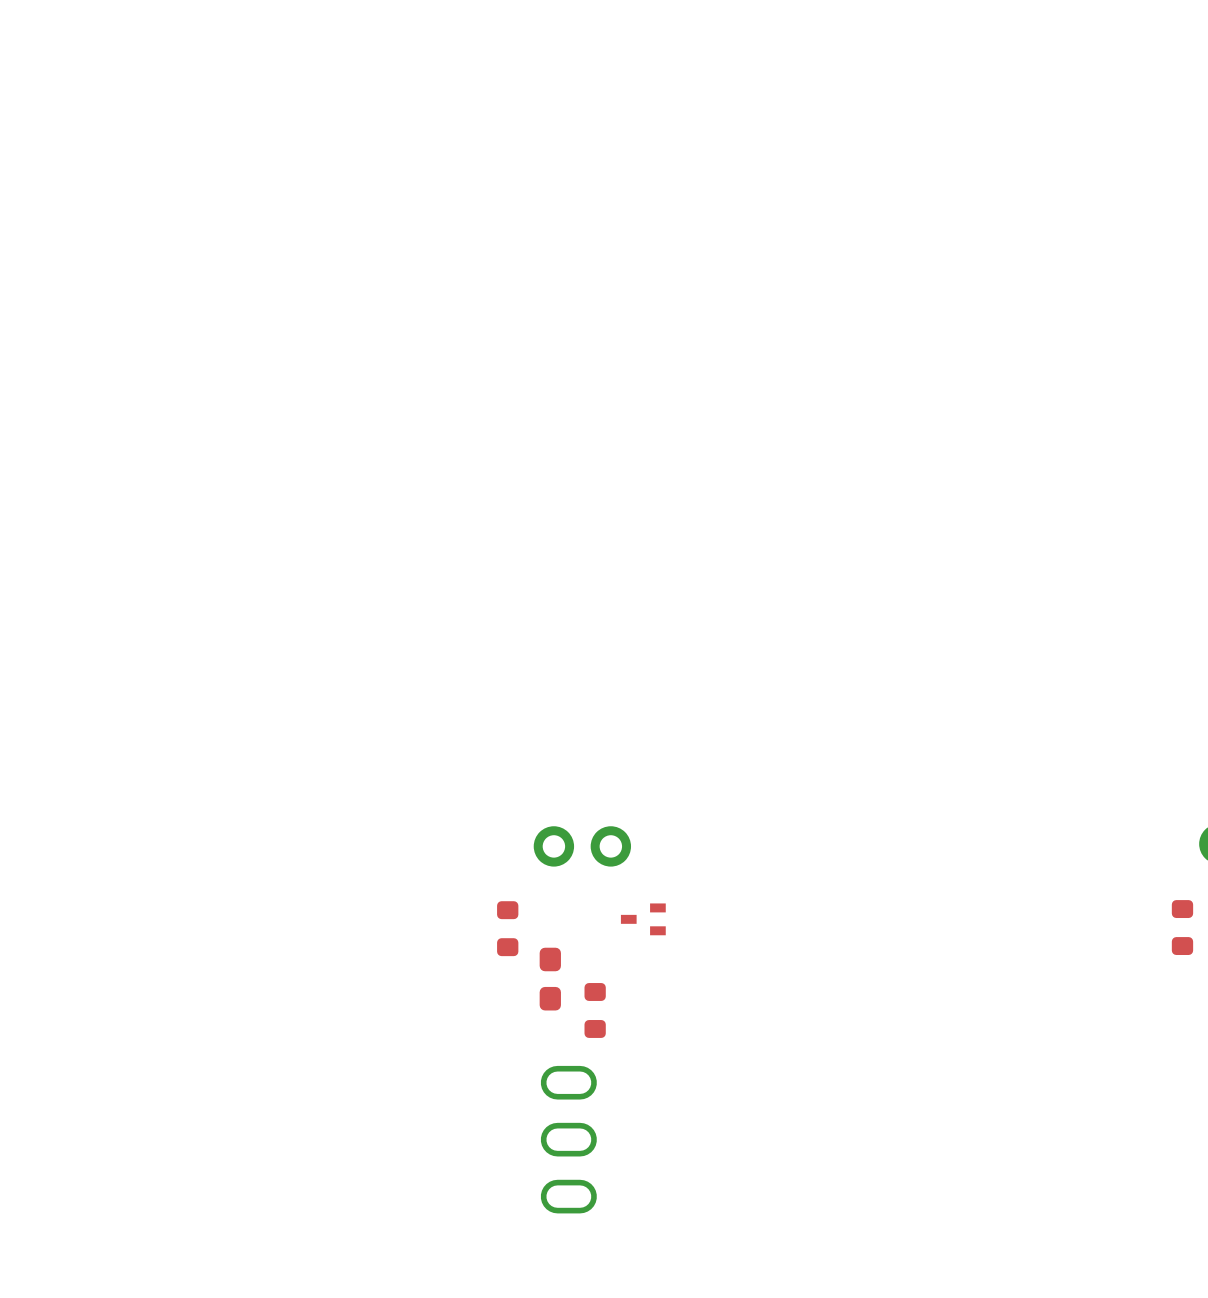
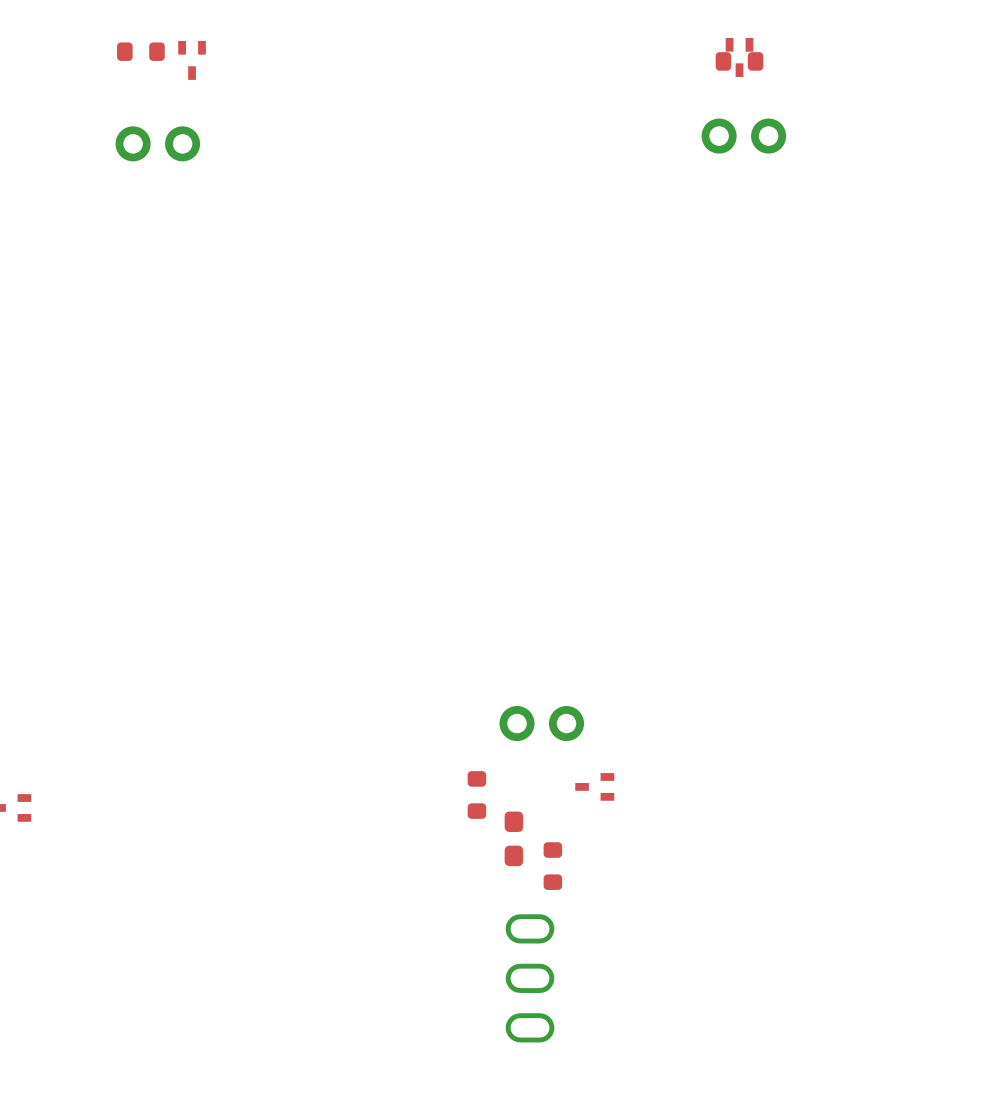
part: none -> (140, 51)
part: none -> (739, 57)
part: none -> (192, 60)
part: none -> (739, 61)
part: none -> (743, 136)
part: none -> (157, 143)

